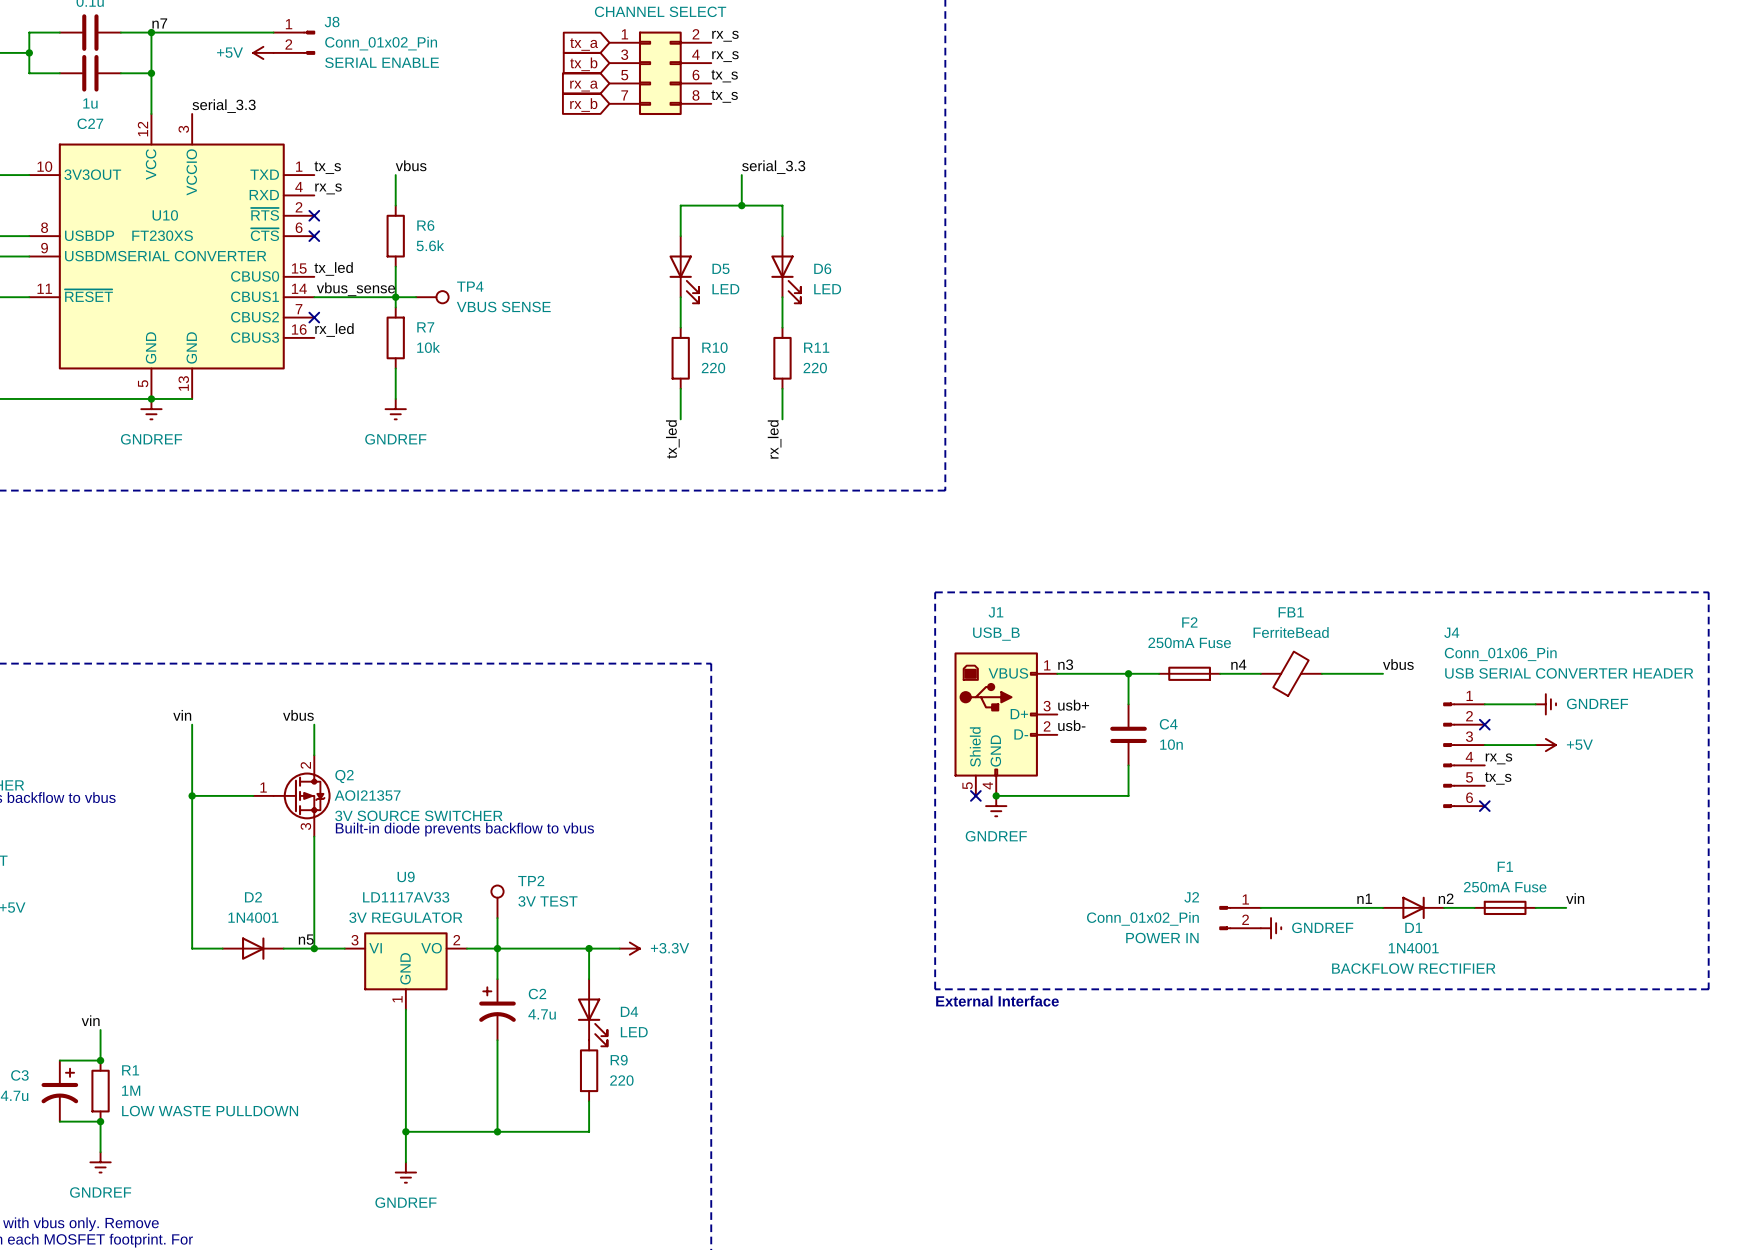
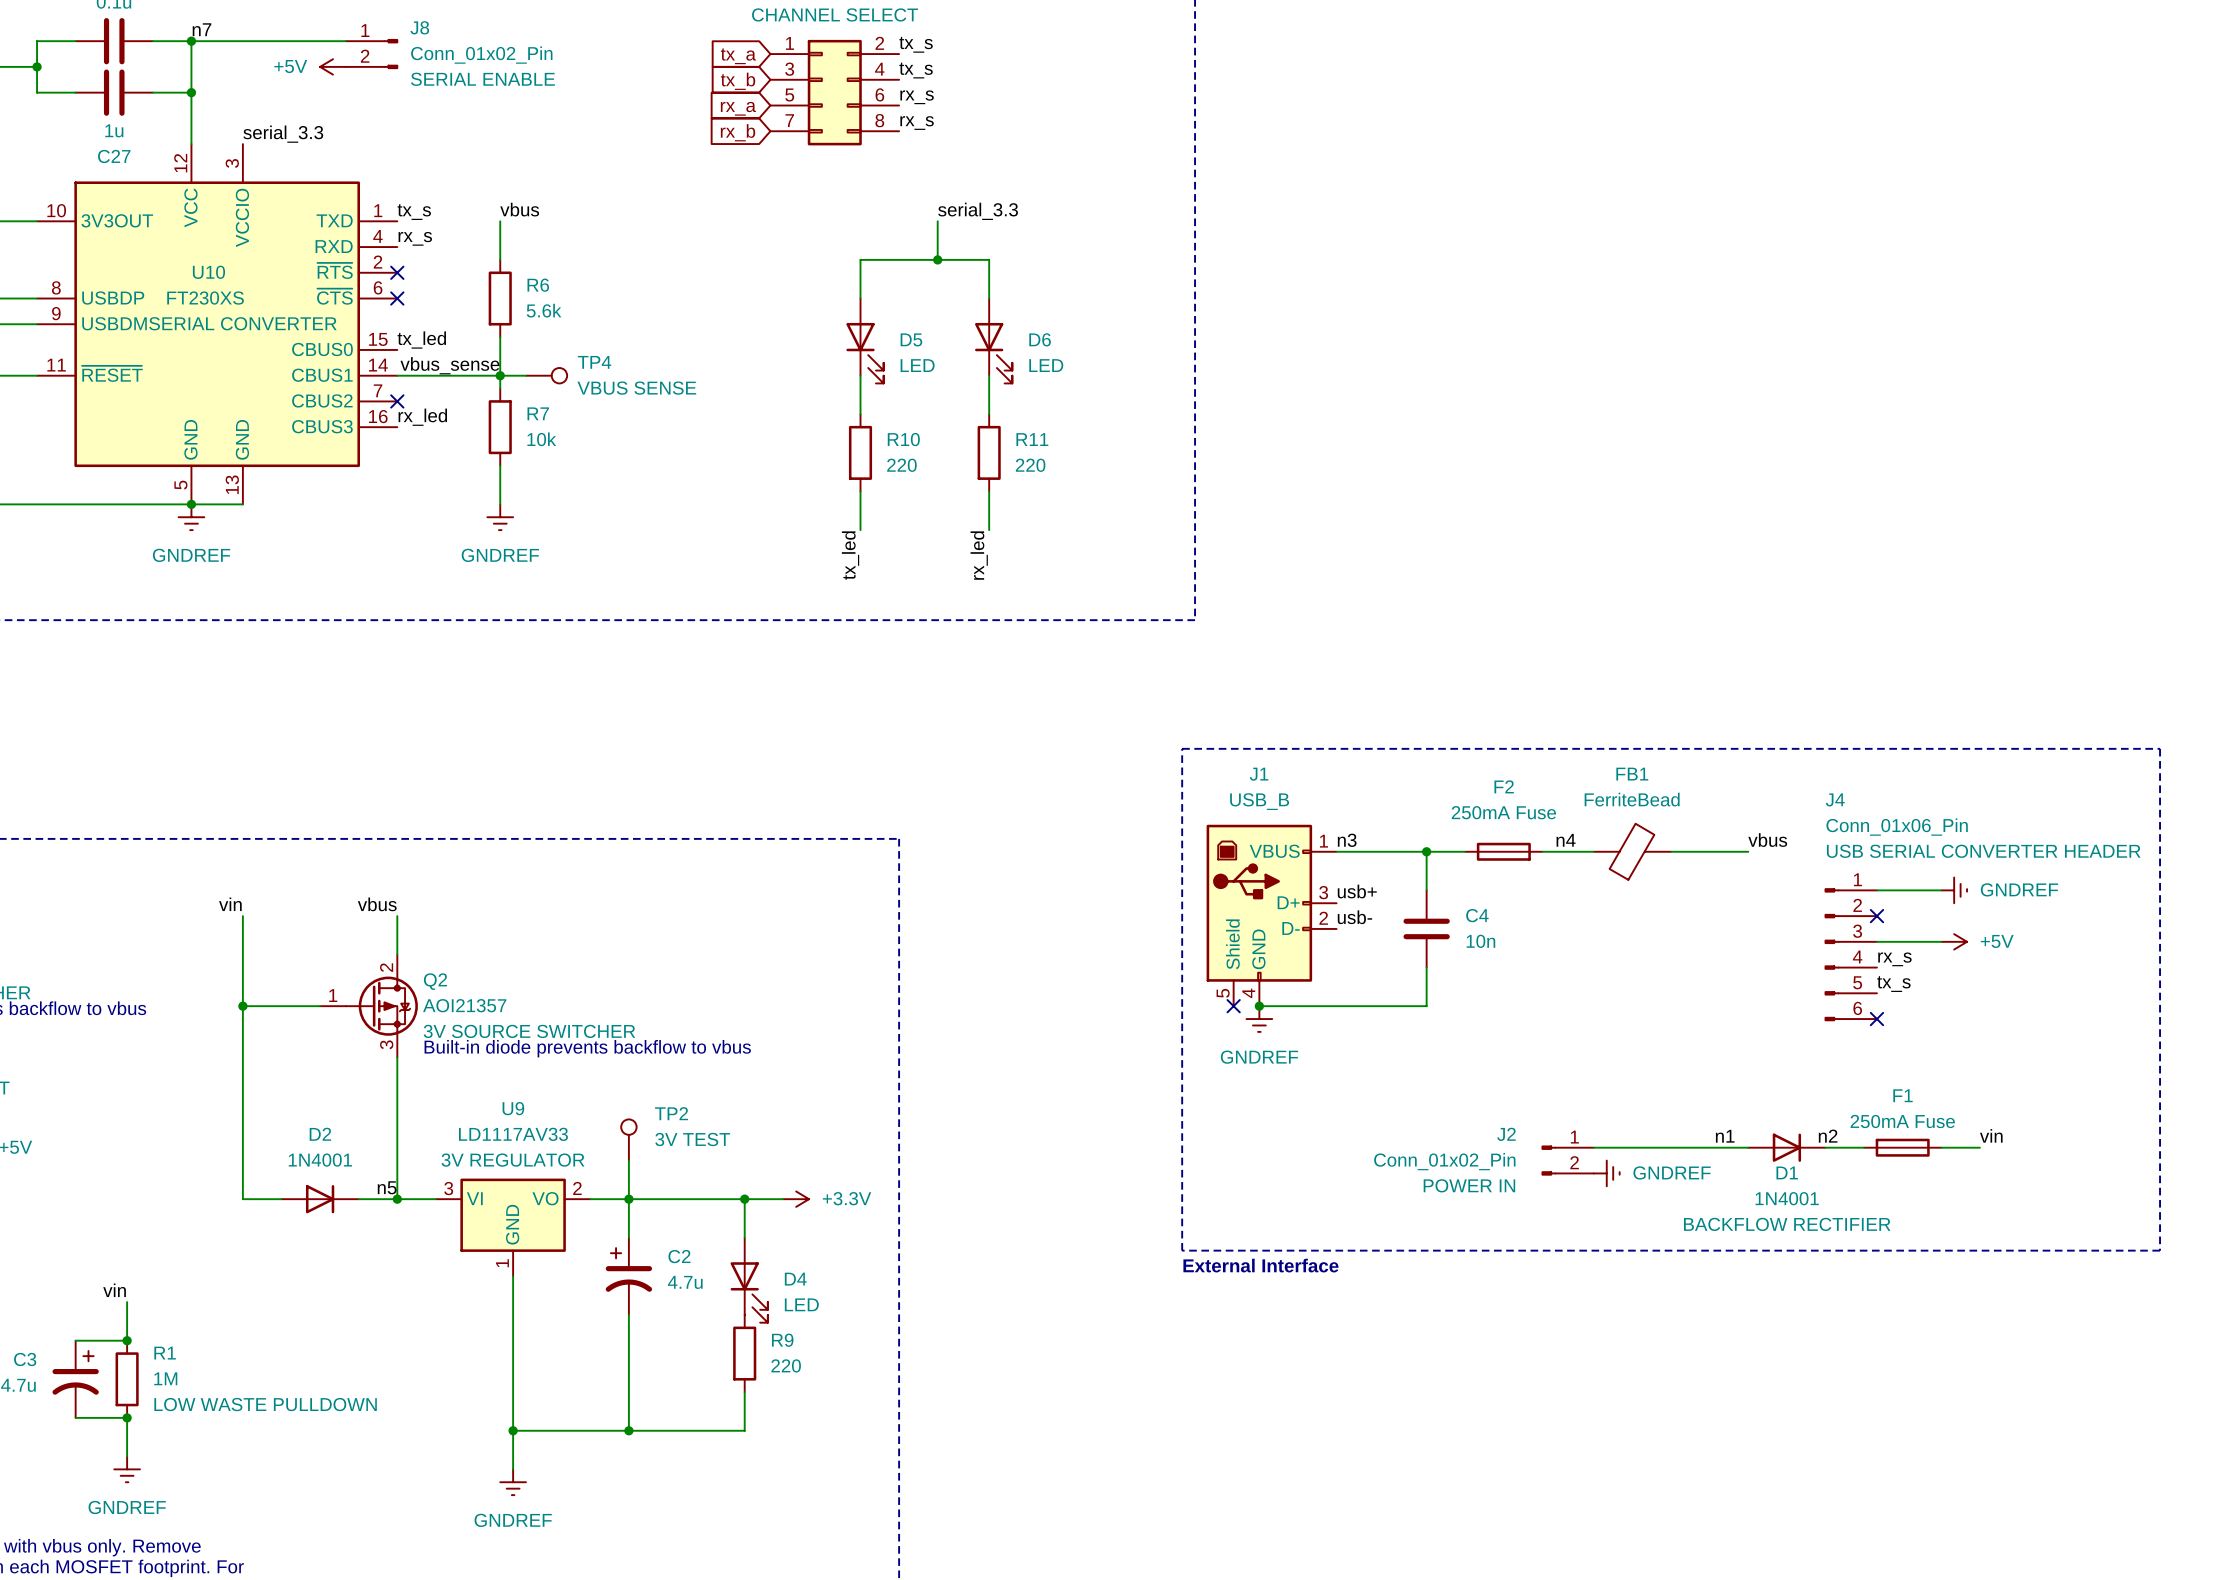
label: rx_s (725, 36) -> tx_s (916, 44)
label: rx_s (725, 56) -> tx_s (916, 70)
label: tx_s (724, 76) -> rx_s (917, 97)
label: tx_s (724, 96) -> rx_s (917, 123)

